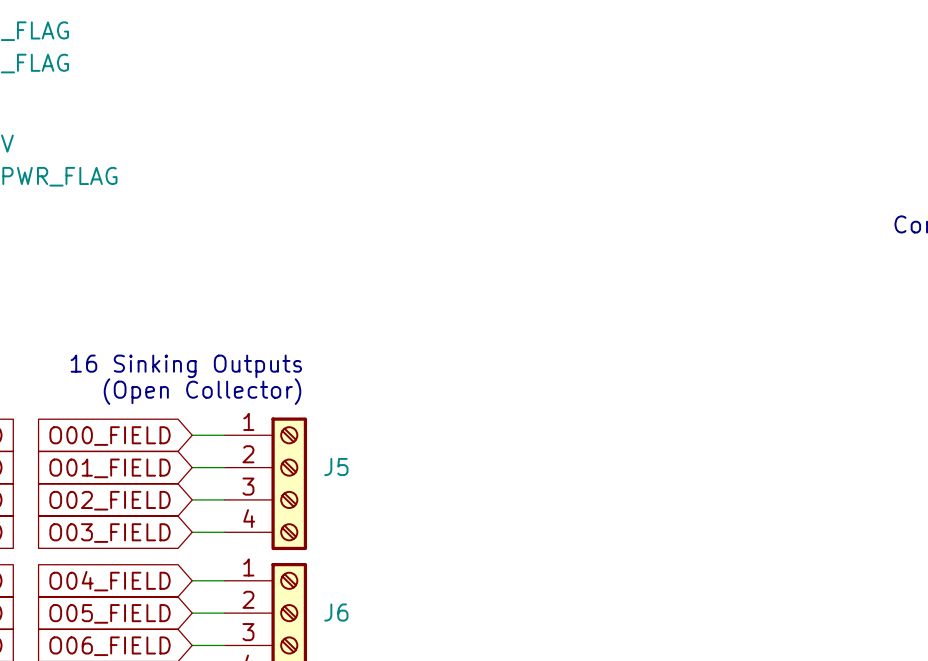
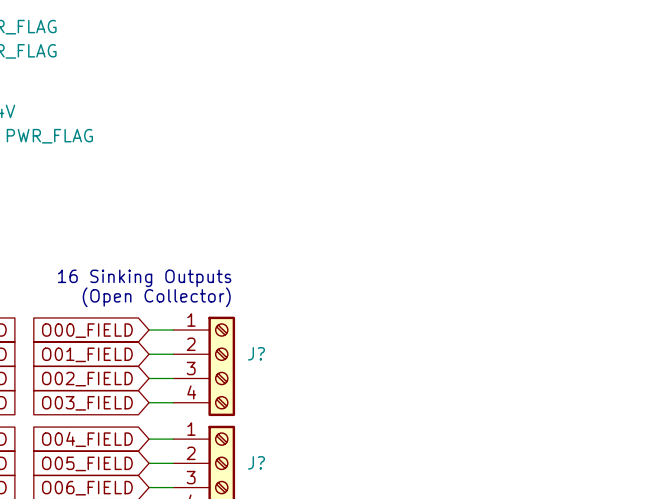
J5 name: J5 (336, 467) -> J? (256, 353)
J6 name: J6 (336, 612) -> J? (256, 462)

